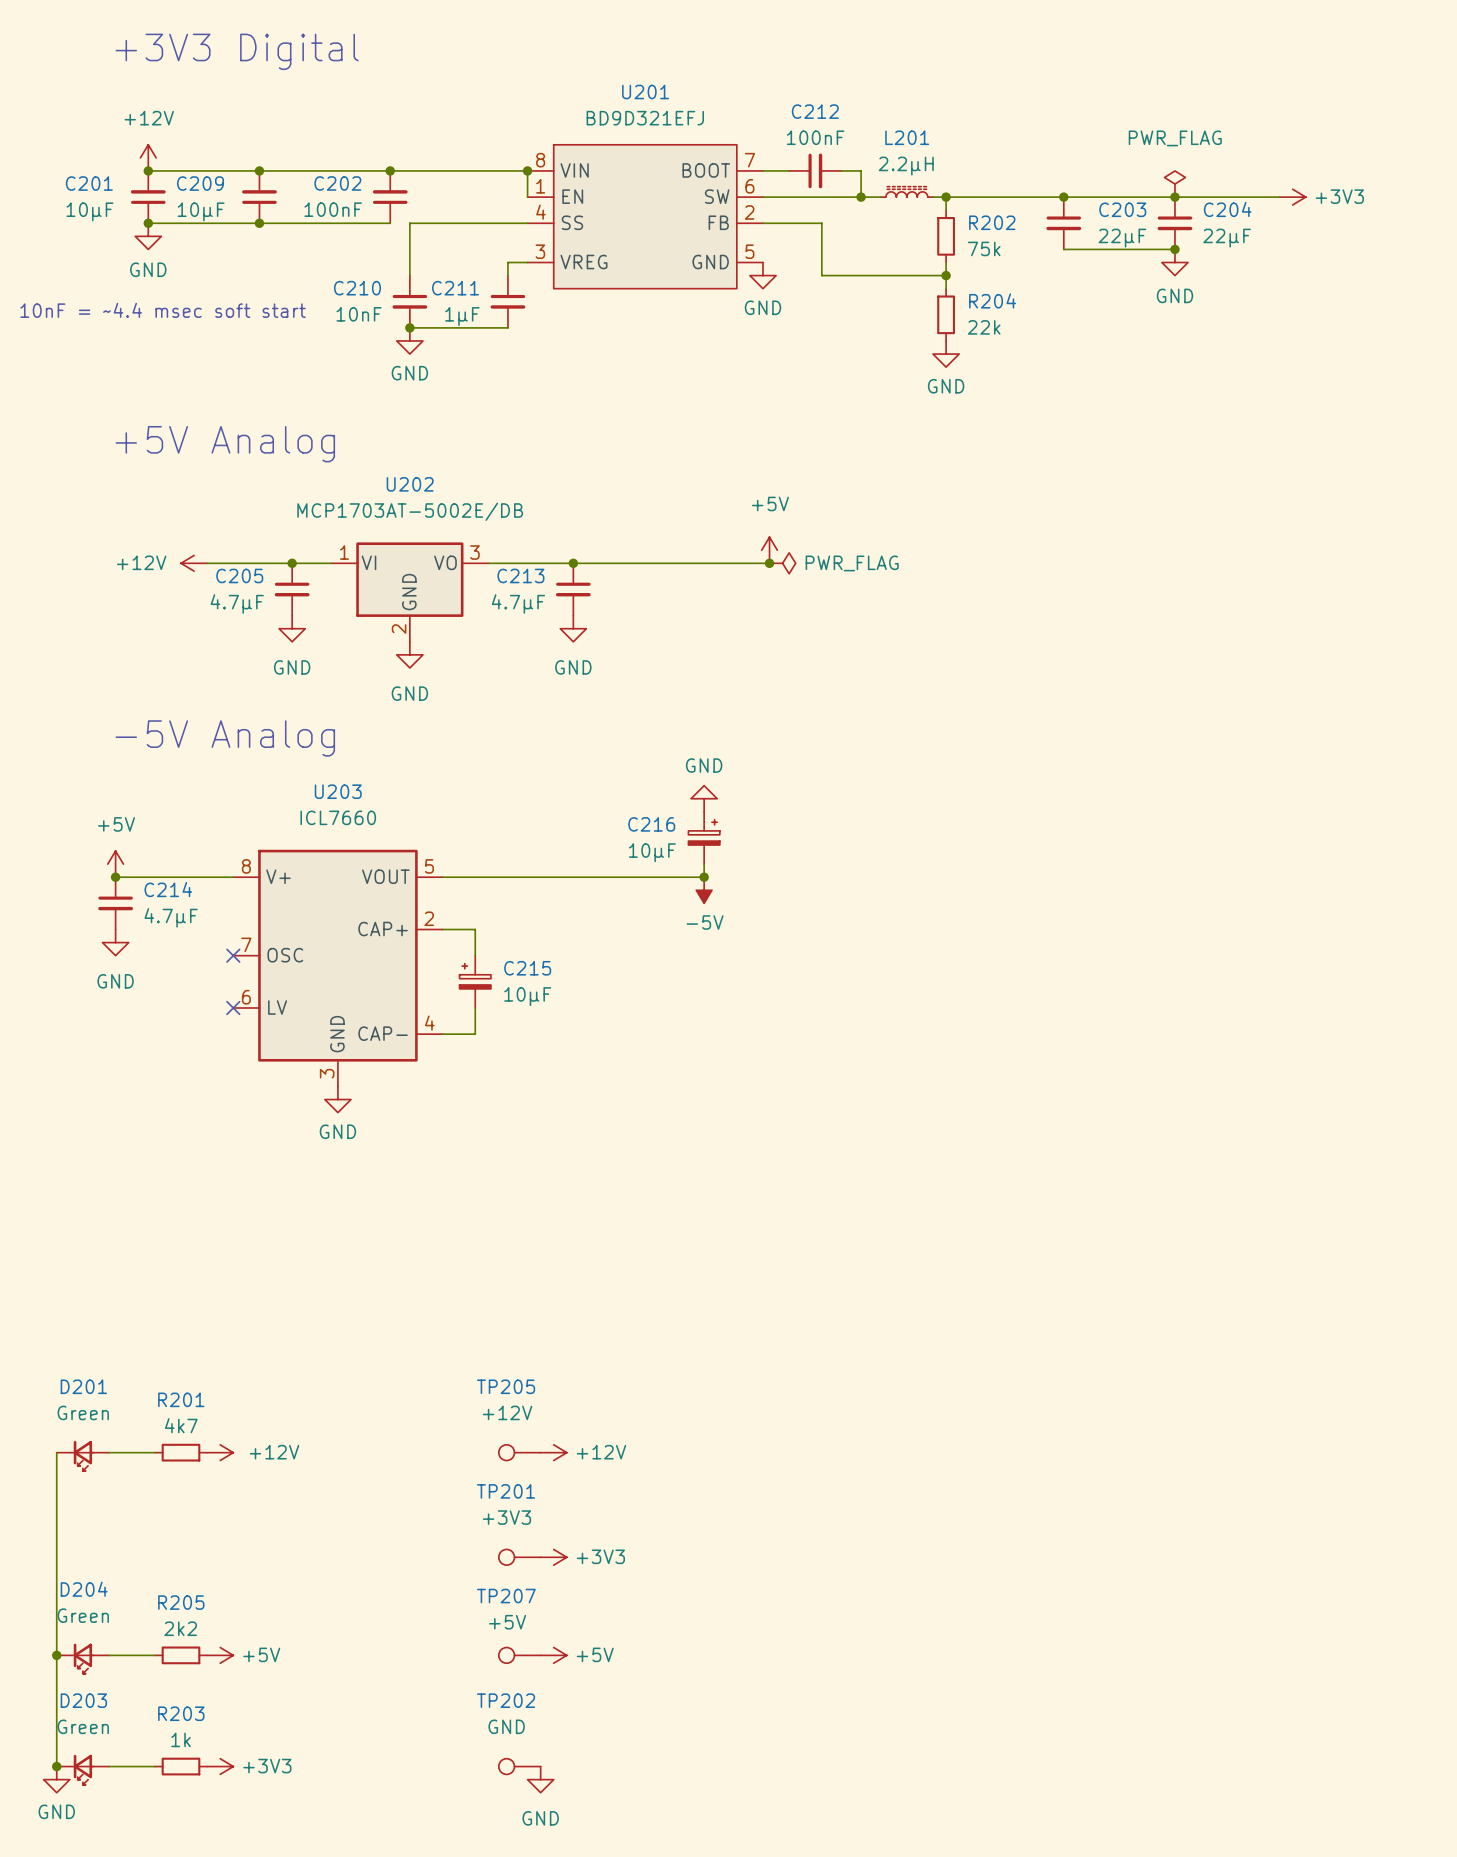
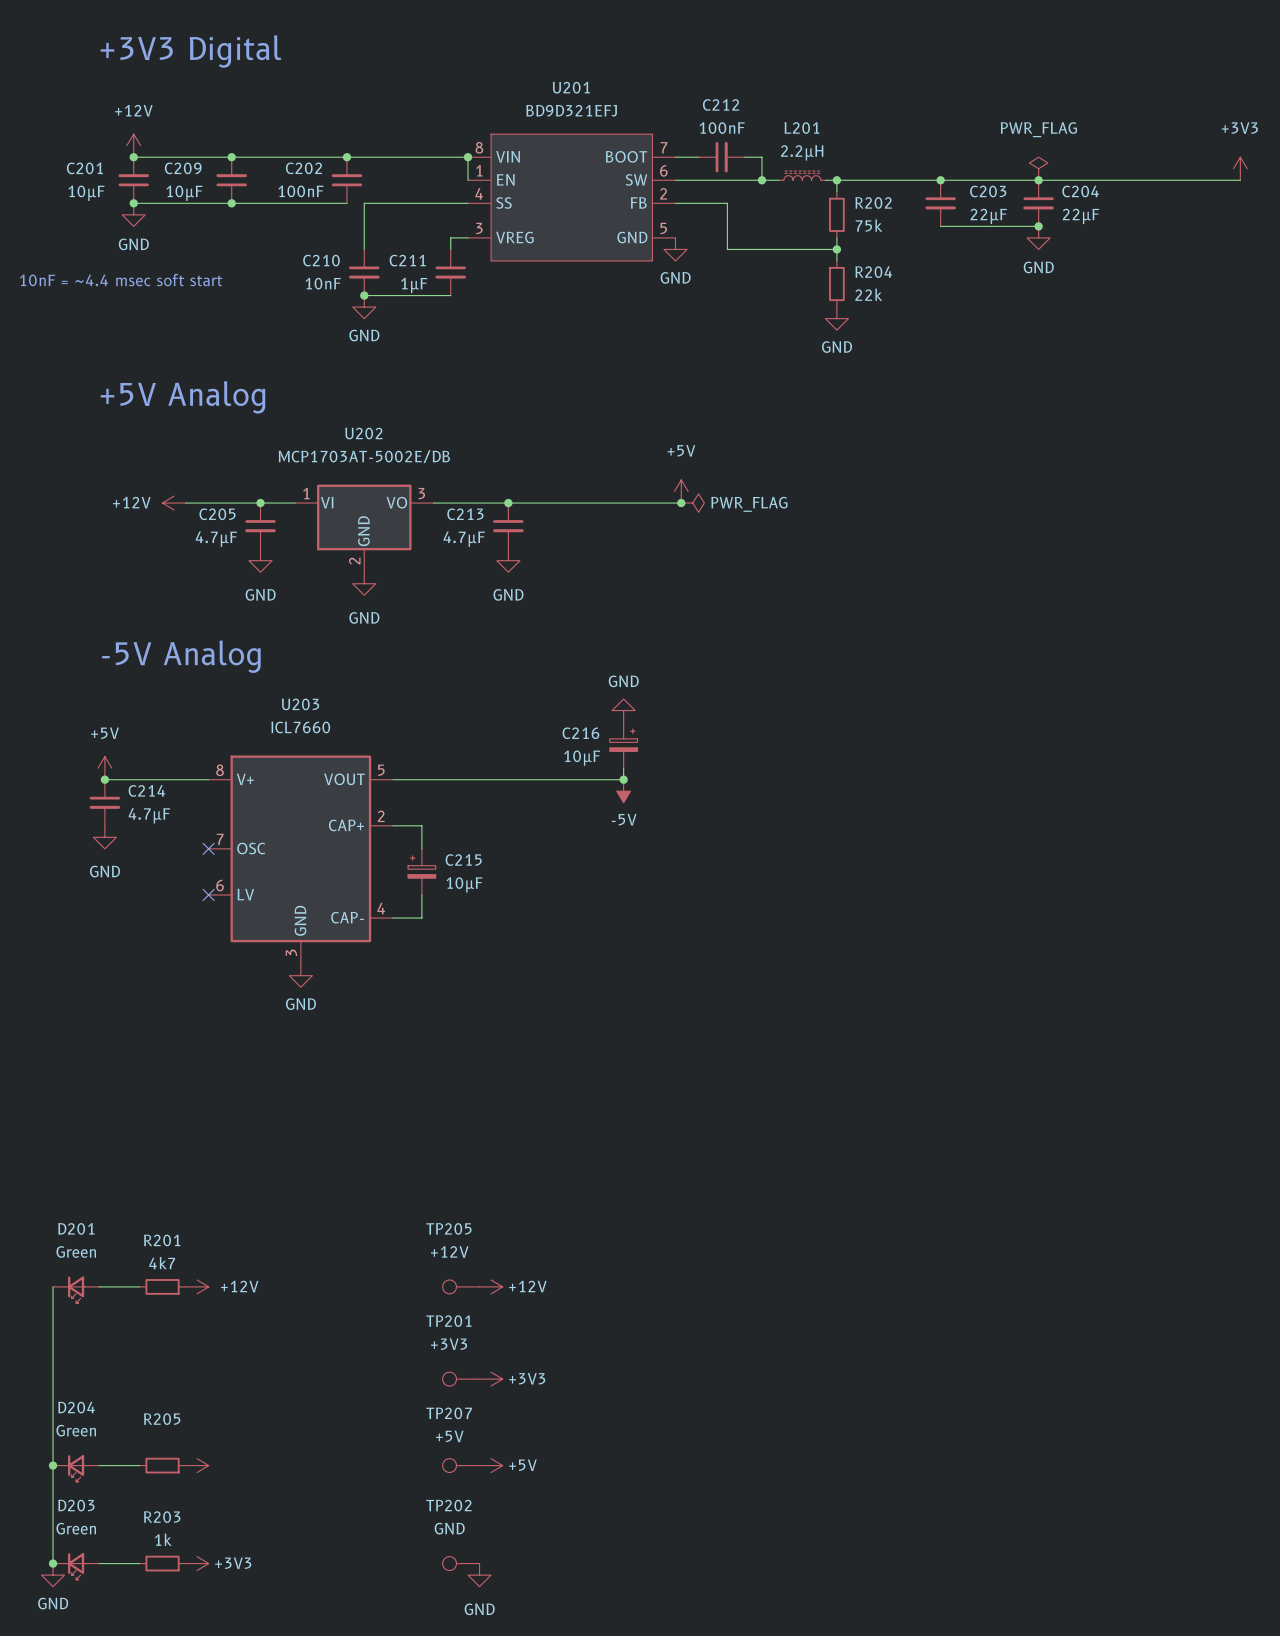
wire: none -> (1130, 180) (1240, 180)
power symbol rotation: 0° (1292, 197) -> 90° counterclockwise (1240, 168)
power symbol position: +3V3 (1292, 197) -> +3V3 (1240, 168)
R205 value: 2k2 (180, 1628) -> none
power symbol text: +5V (261, 1654) -> none

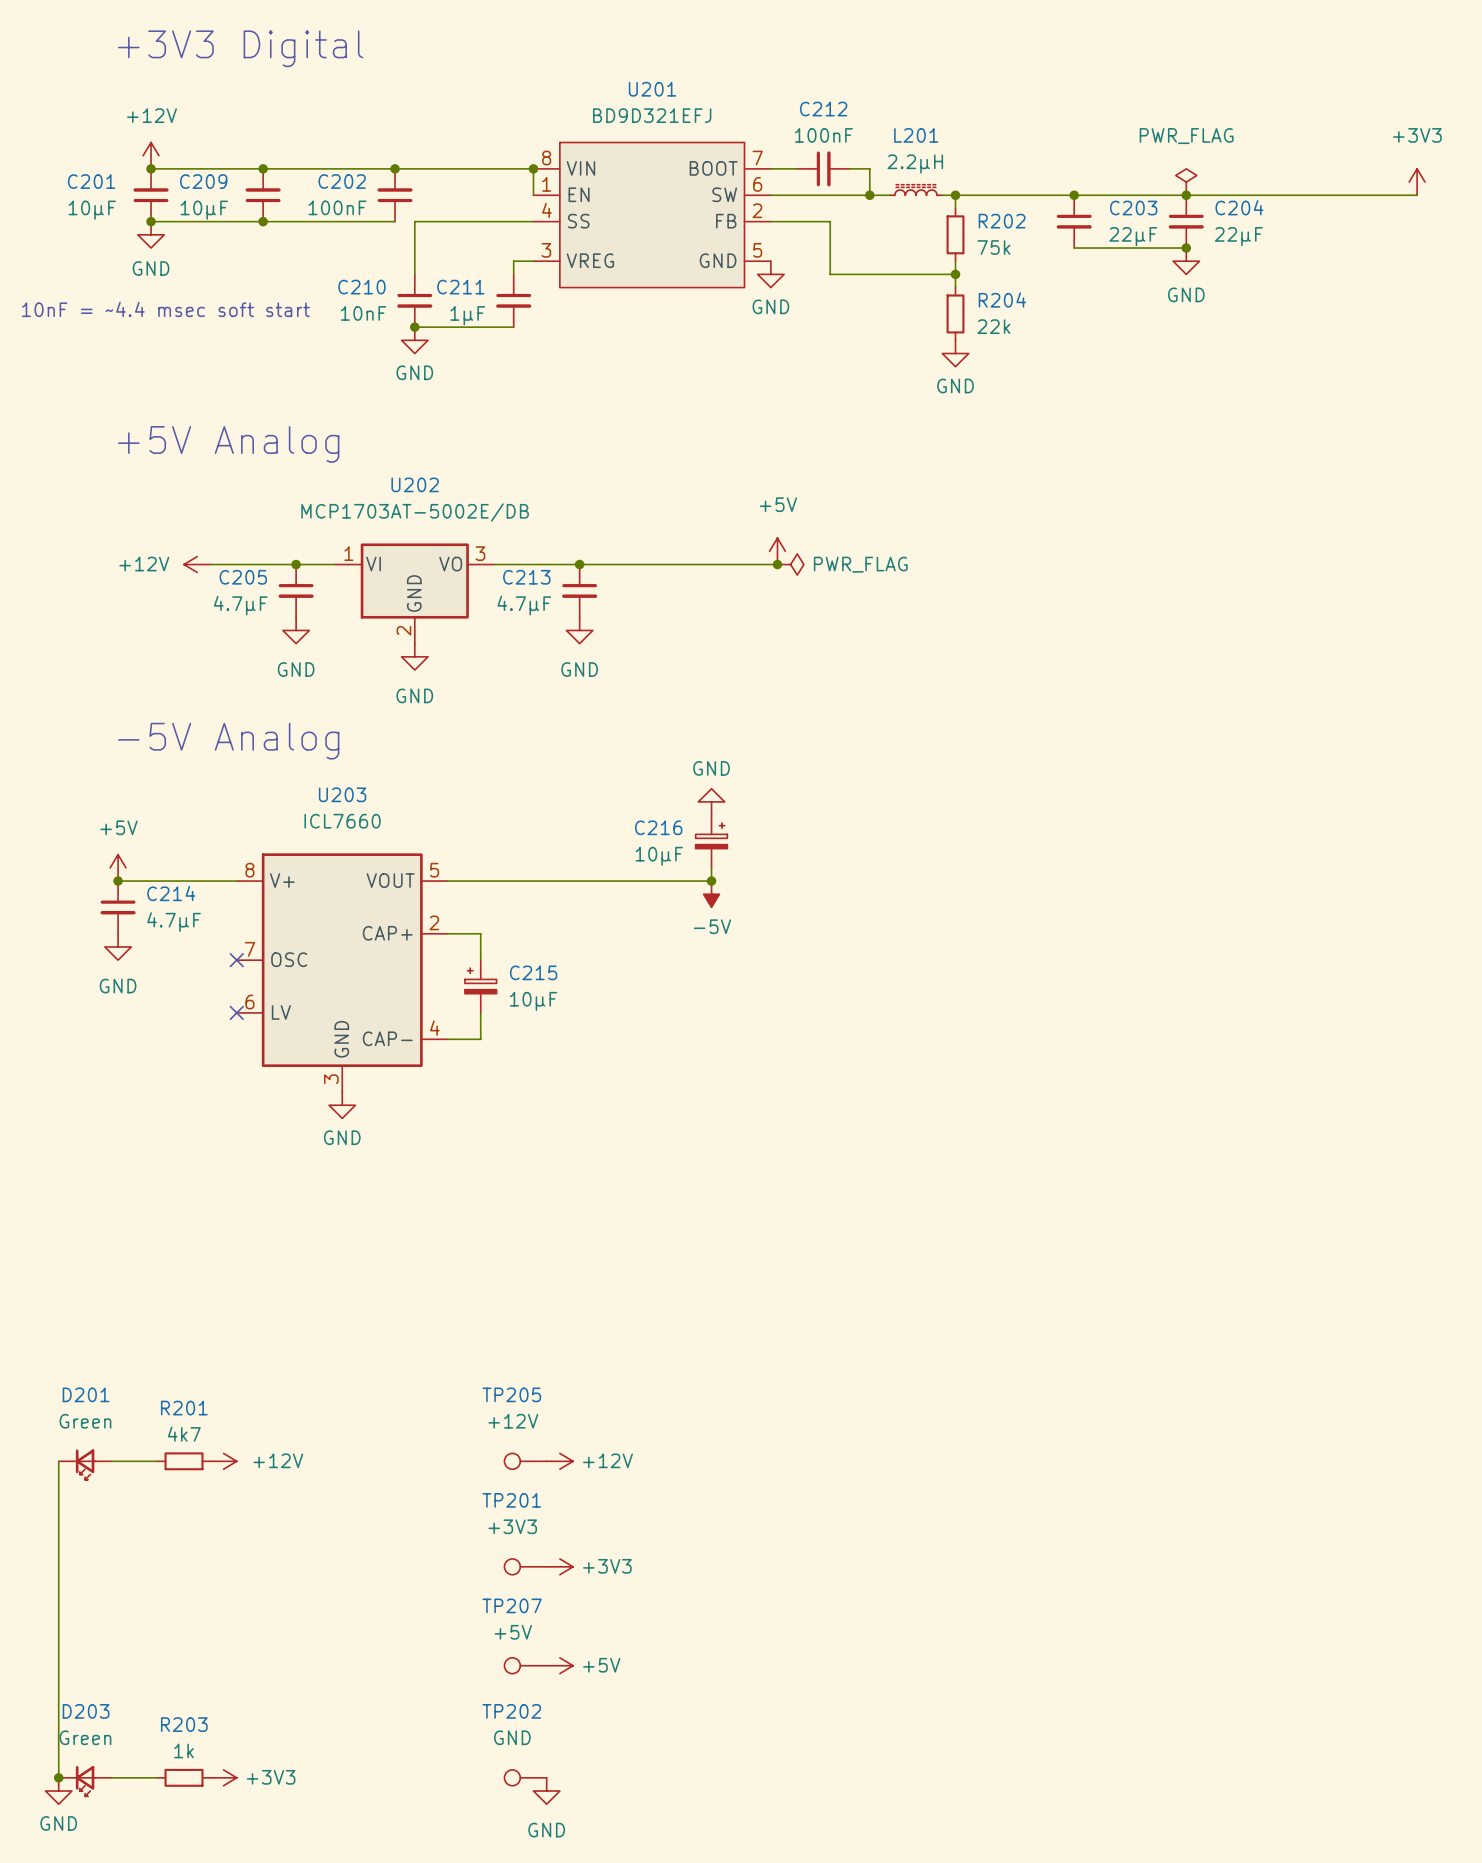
junction: (53, 1465) -> none
wire: (99, 1465) (139, 1465) -> none
R205: (162, 1465) -> none
power symbol: (197, 1465) -> none
D204: Green (76, 1468) -> none

